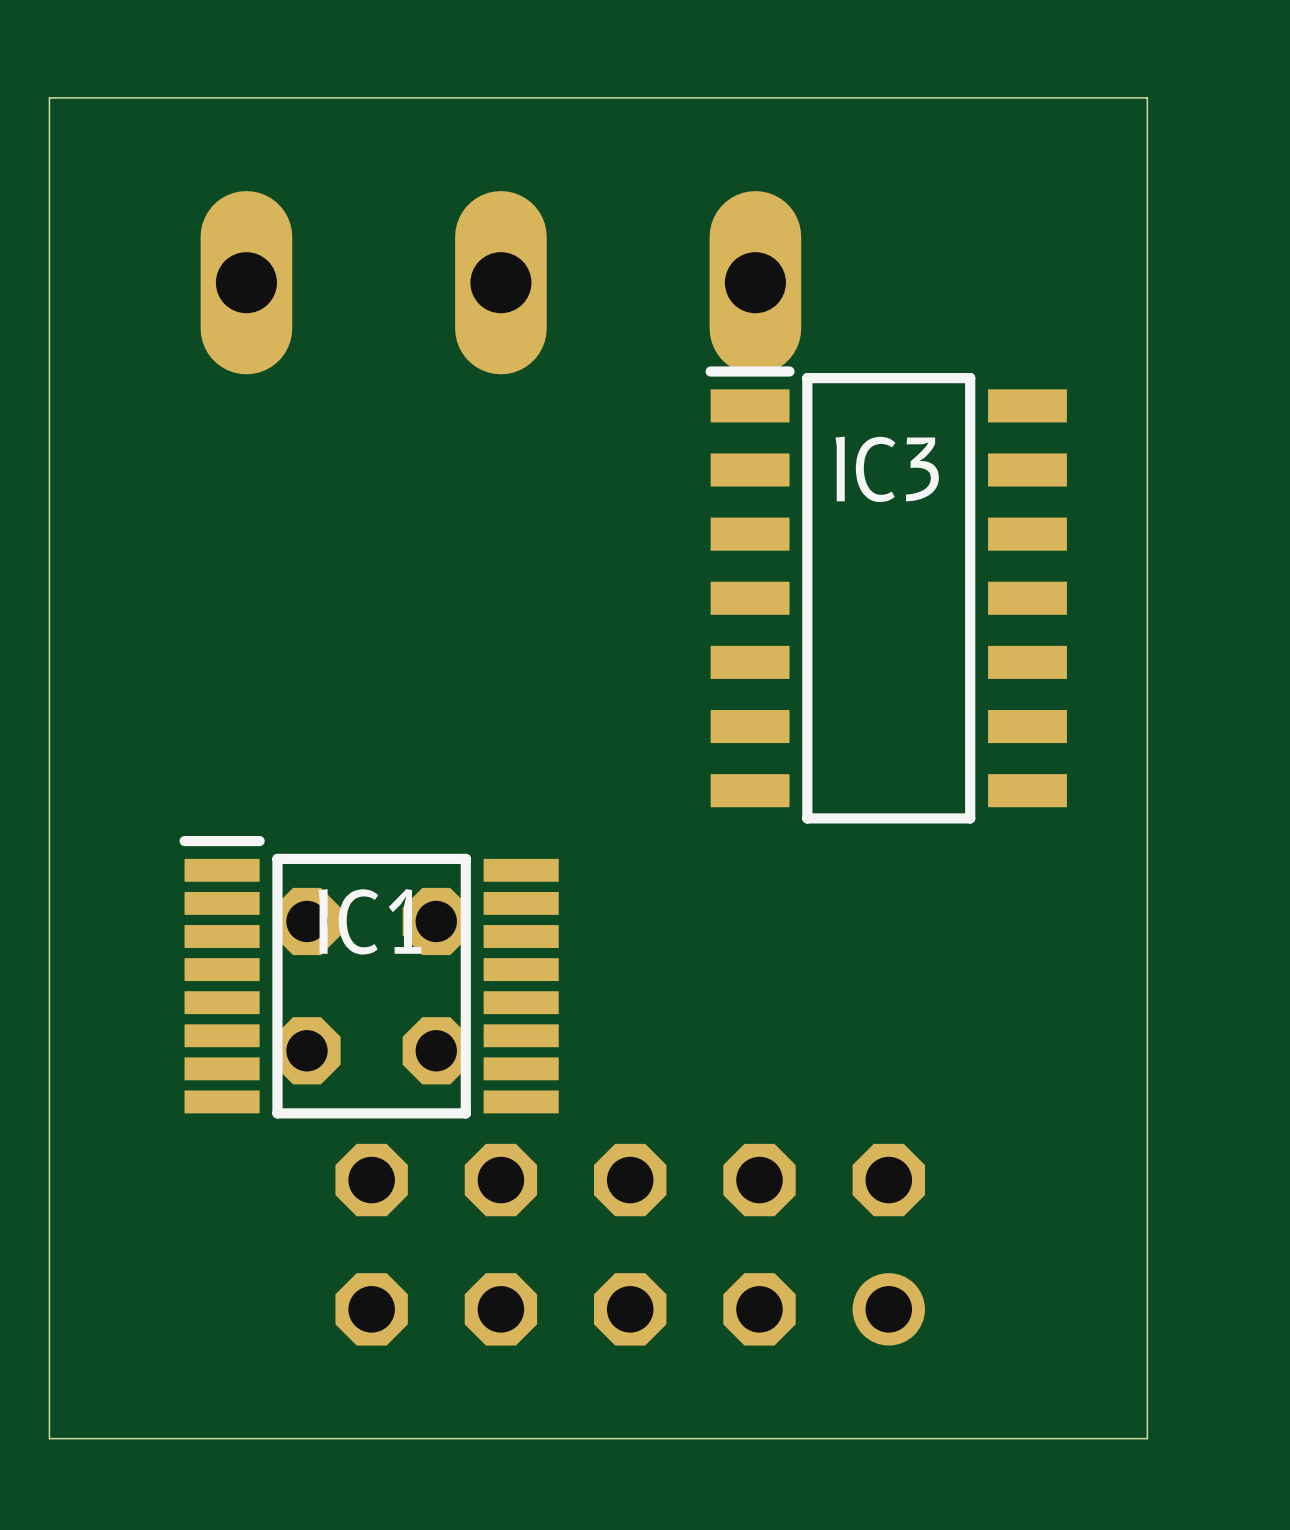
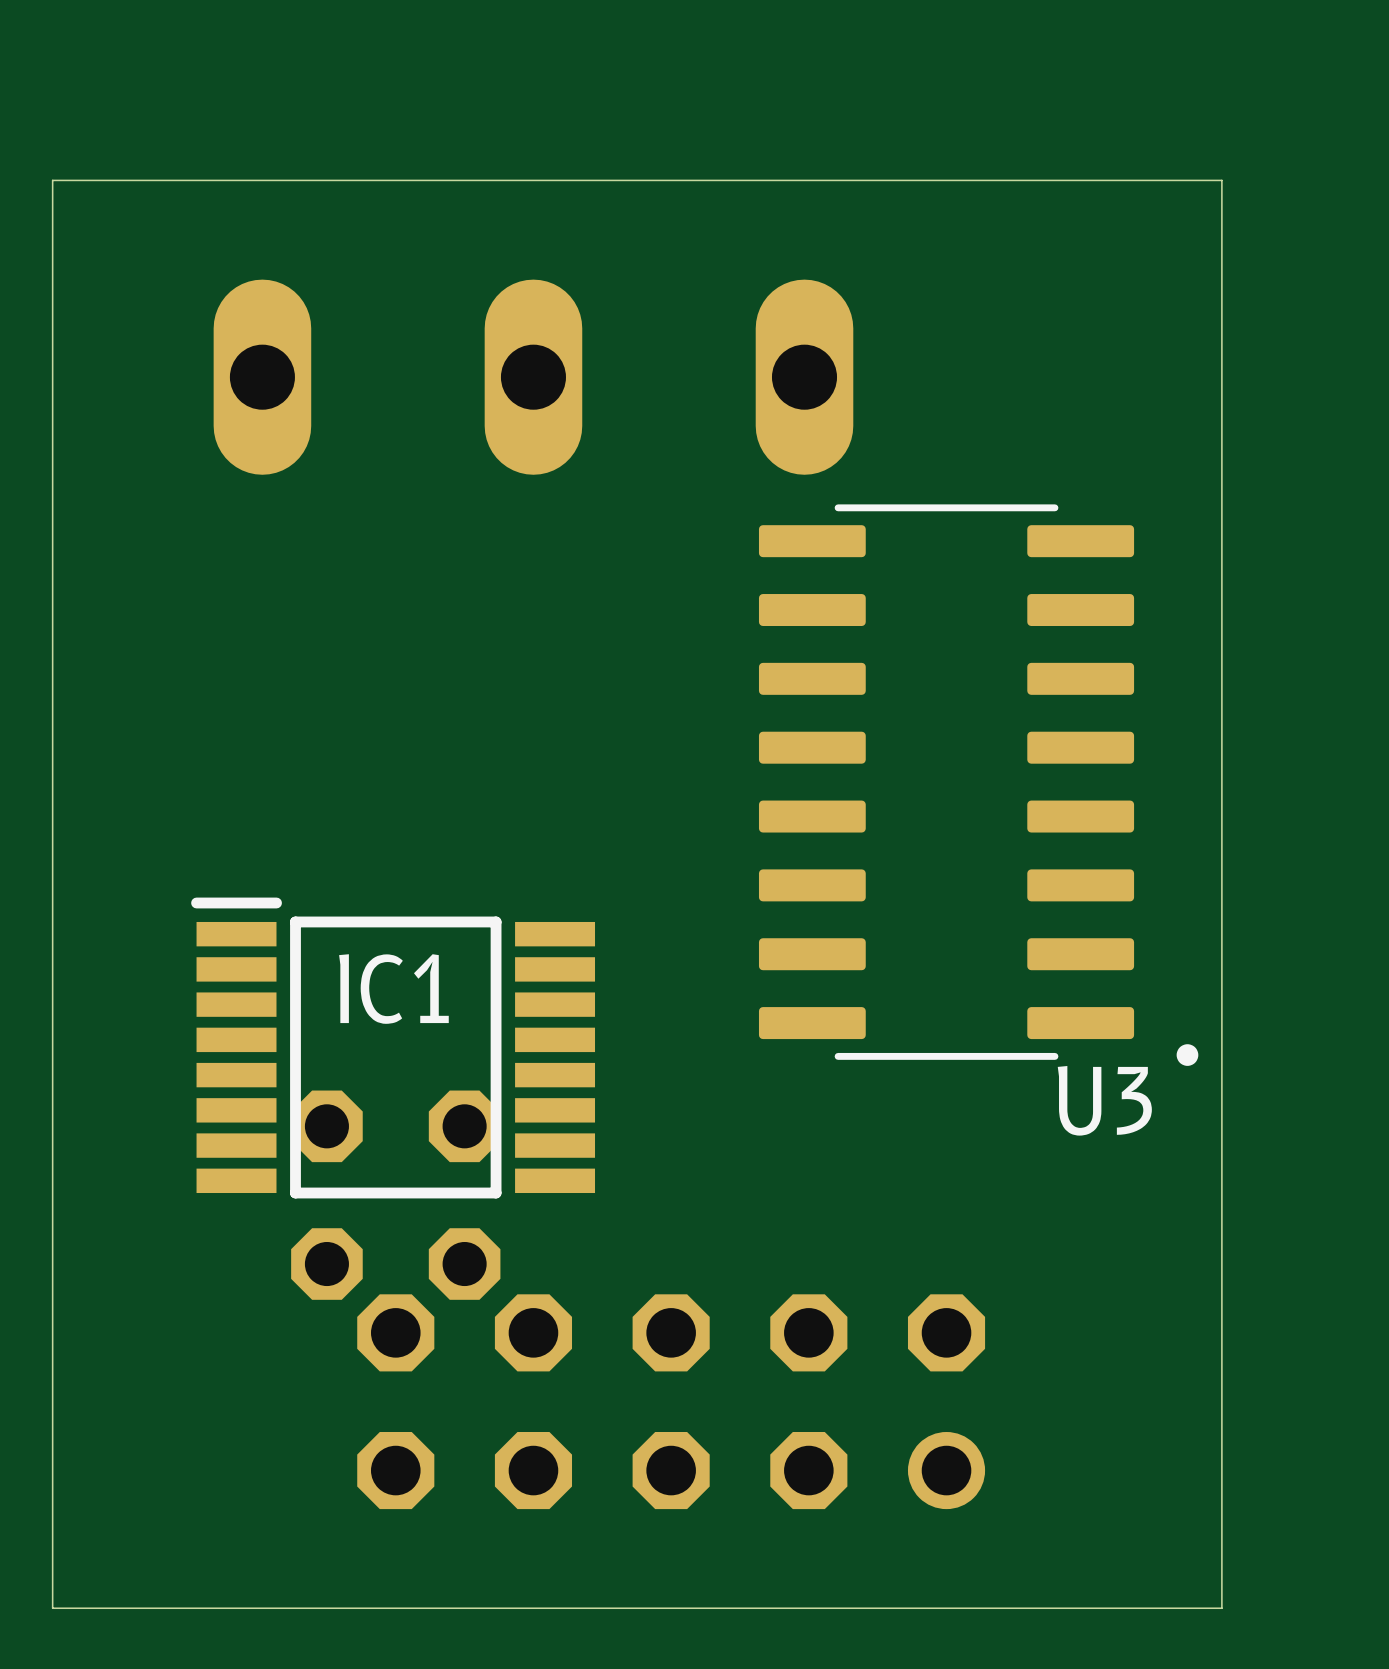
IC3: (886, 594) -> none
U3: none -> (978, 785)
IC1 position: (369, 977) -> (393, 1048)
part position: (371, 986) -> (395, 1195)

